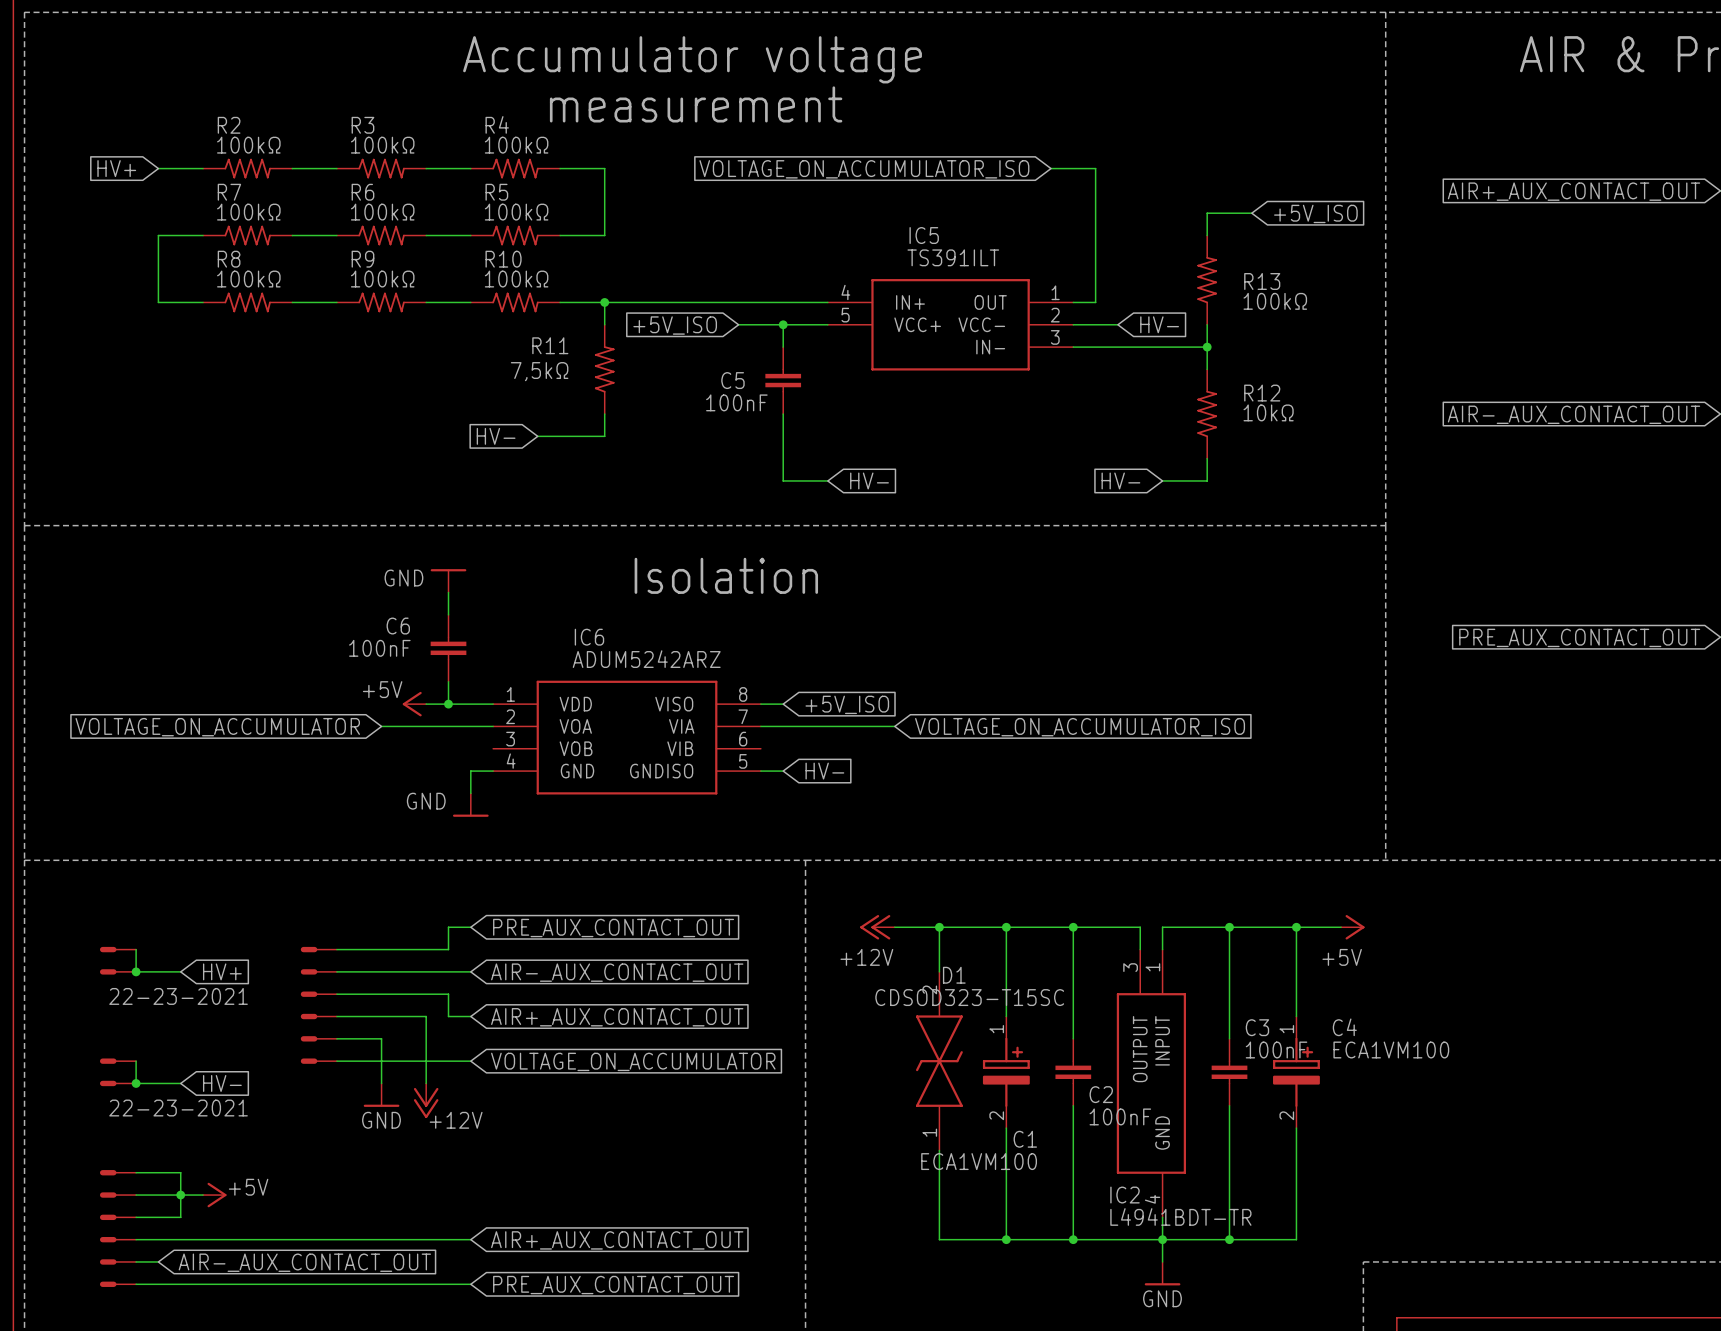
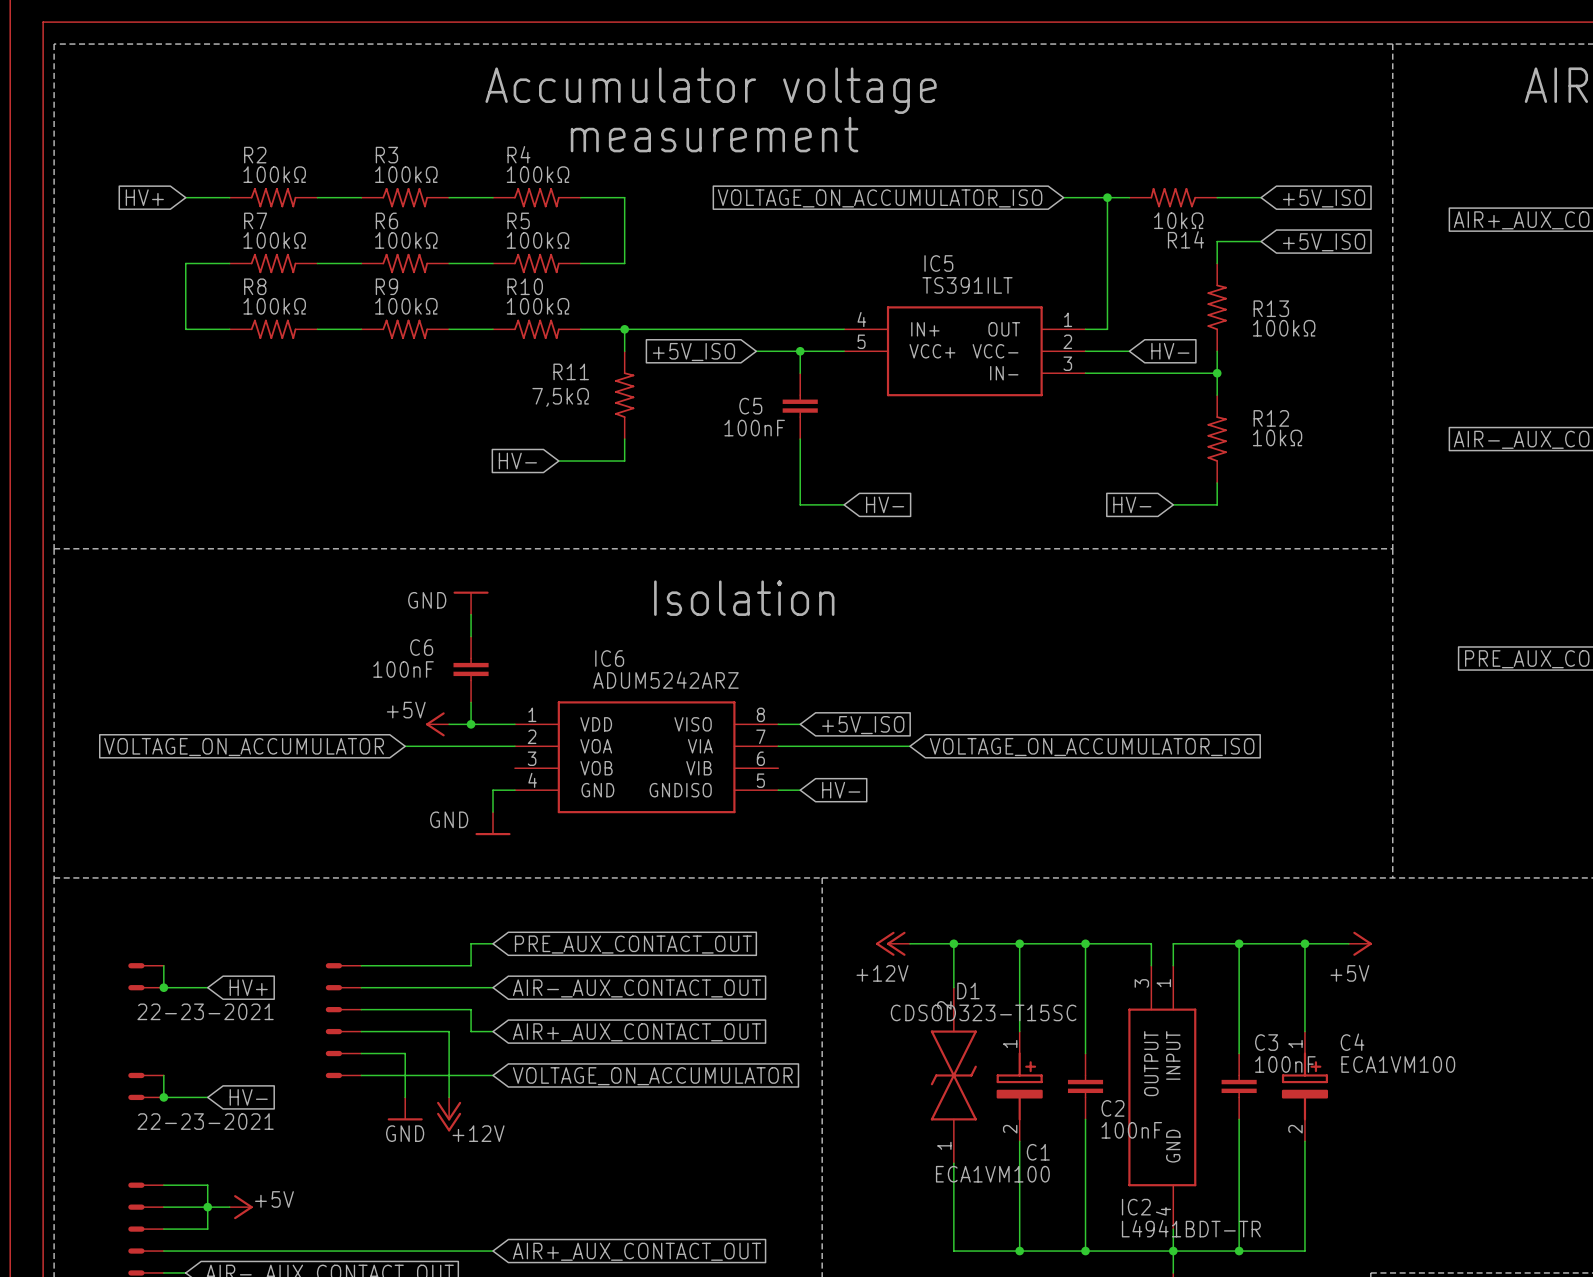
wire: none -> (1107, 197) (1129, 197)
junction: none -> (1107, 197)
R14: none -> 10kΩ (1173, 197)
wire: none -> (1217, 197) (1261, 197)
global label: none -> +5V_ISO (1324, 198)

